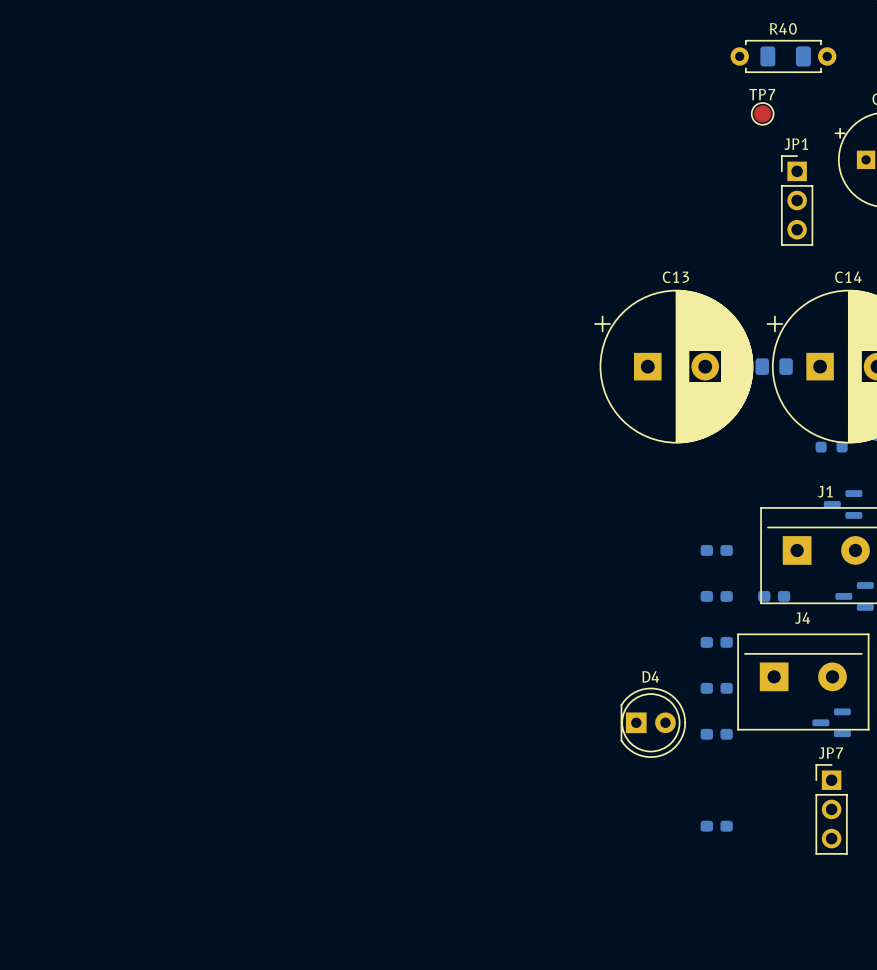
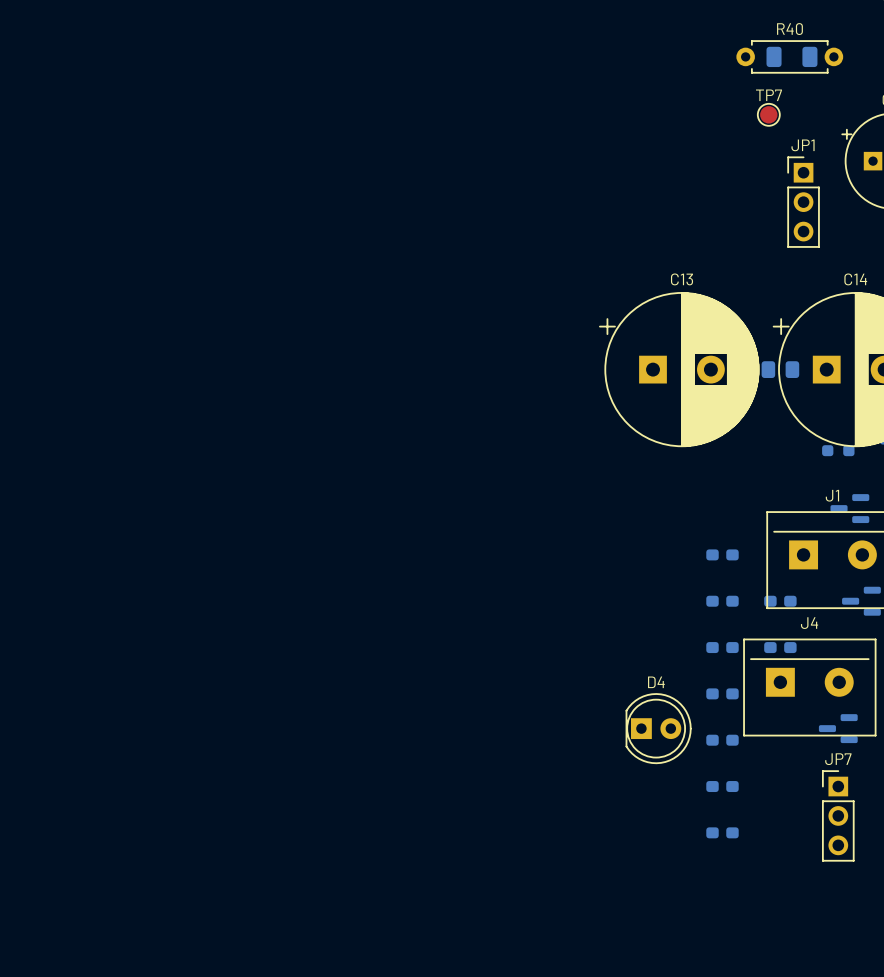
part: none -> (780, 647)
part: none -> (722, 786)

